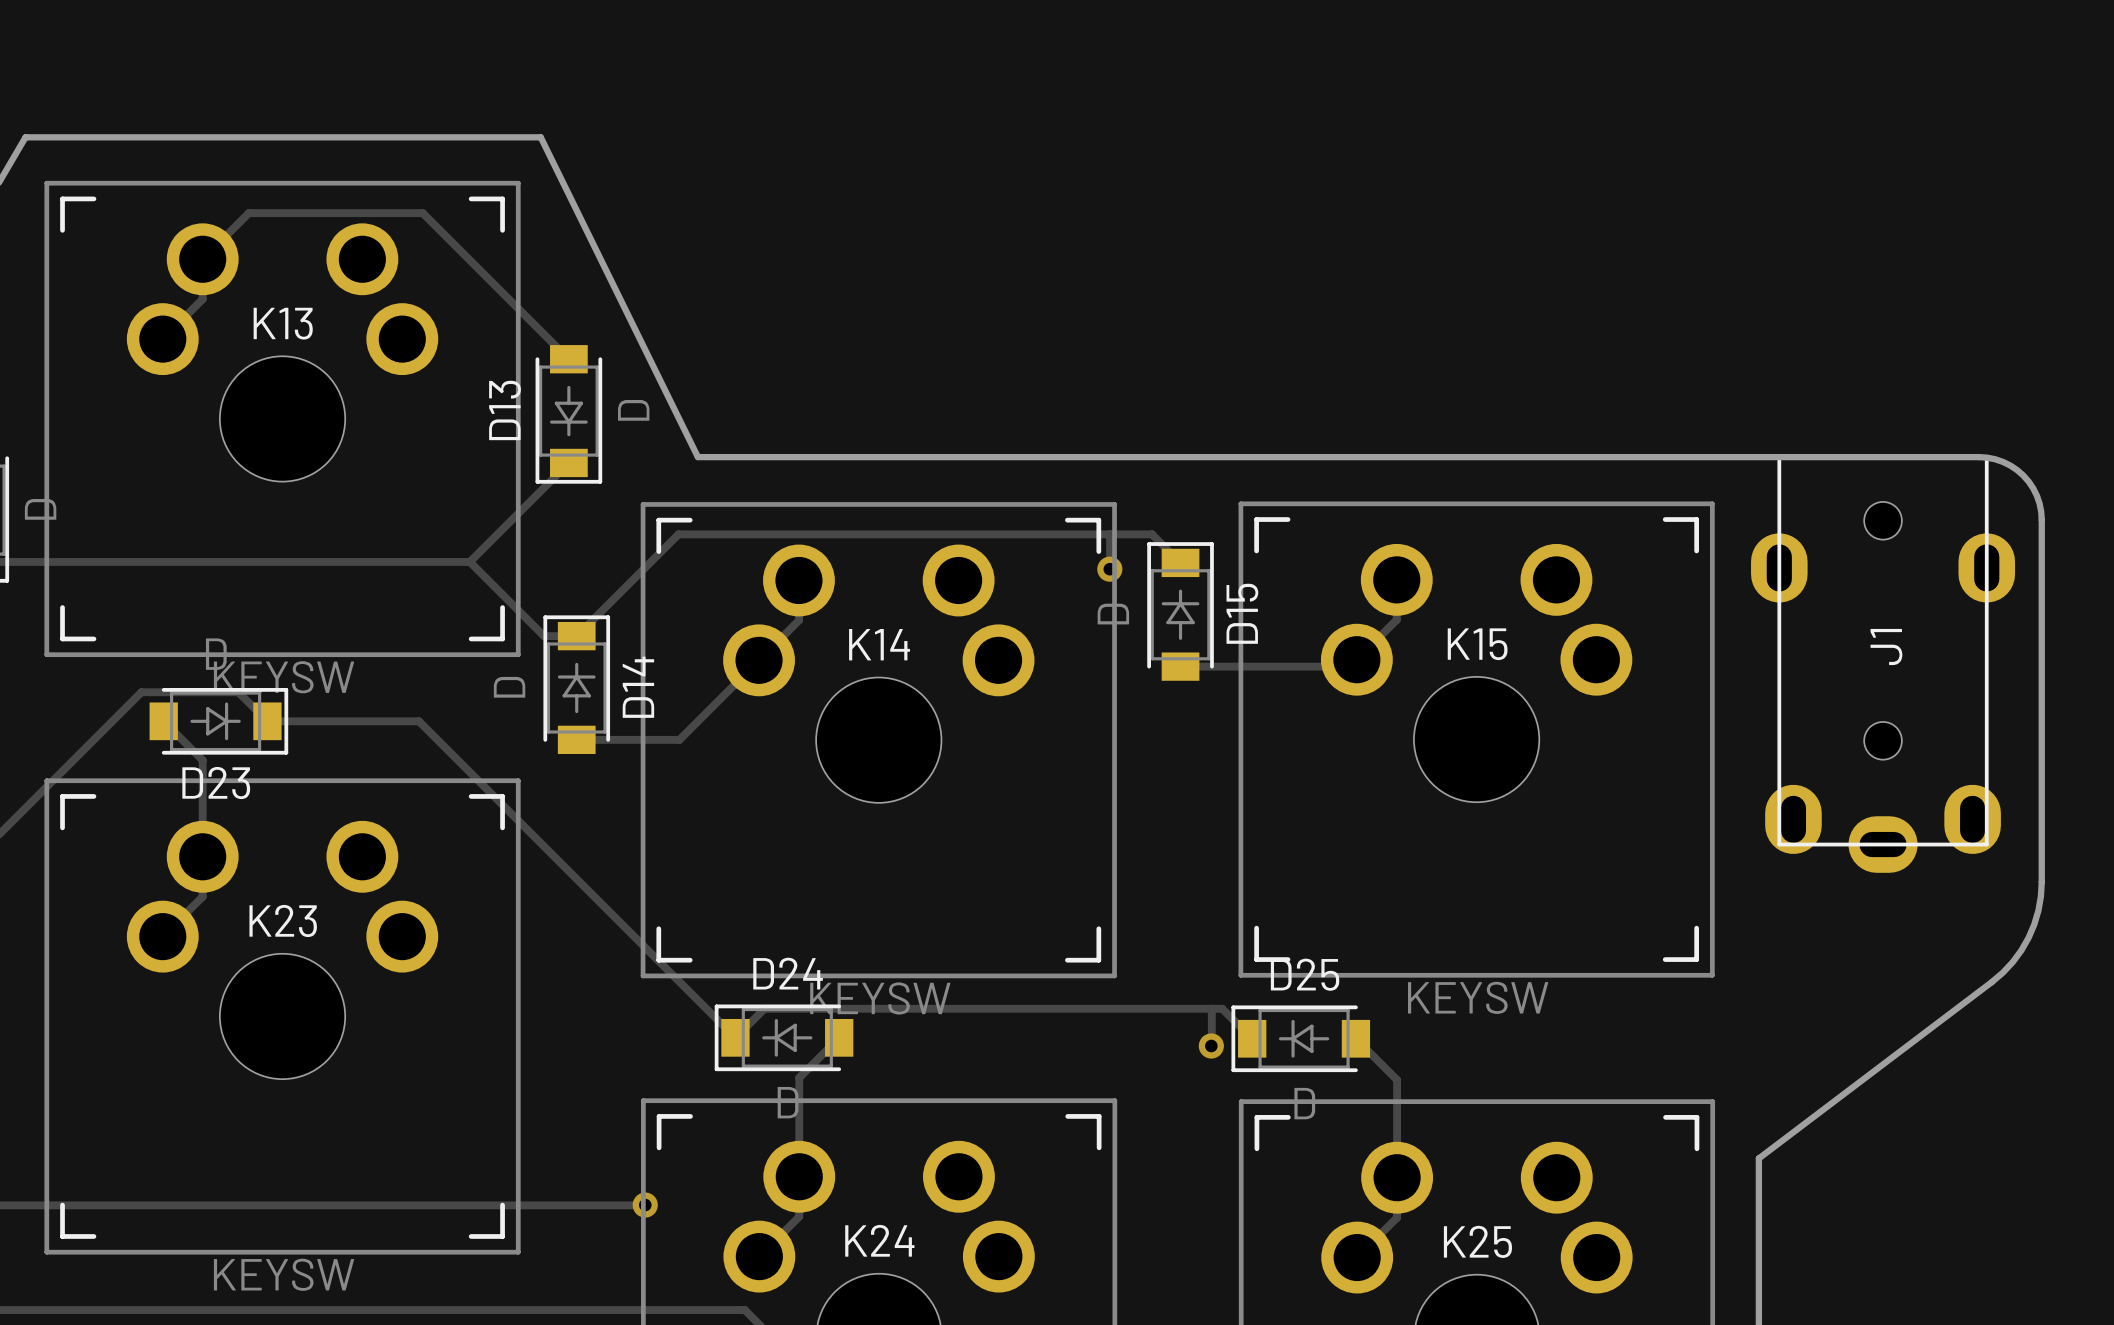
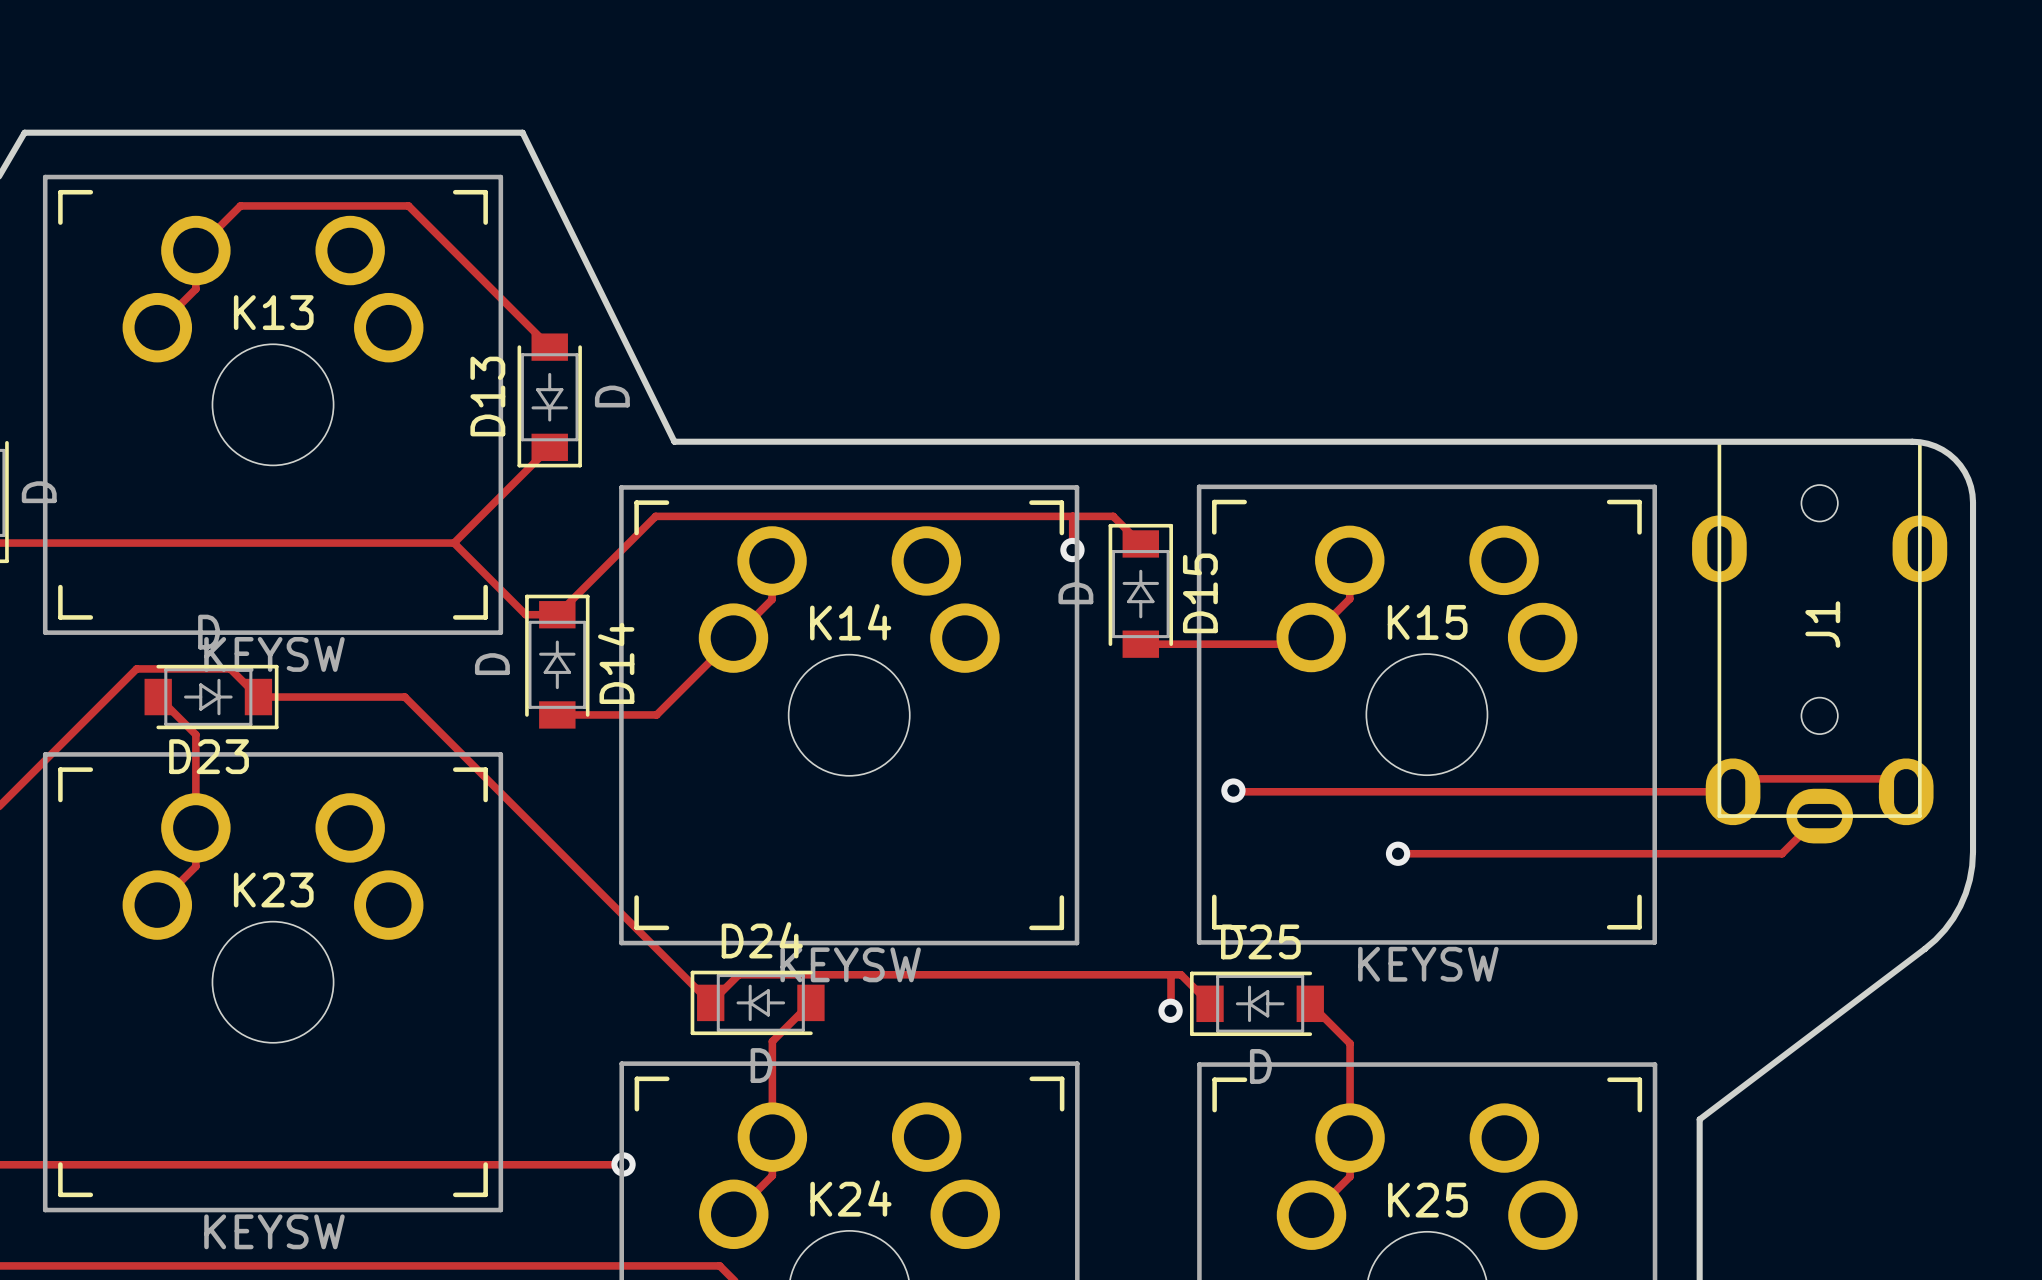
track: none -> (1233, 790) (1733, 791) (1745, 778) (1893, 778) (1906, 791)
via: none -> (1233, 790)
track: none -> (1819, 816) (1781, 853) (1398, 853)
via: none -> (1398, 853)

